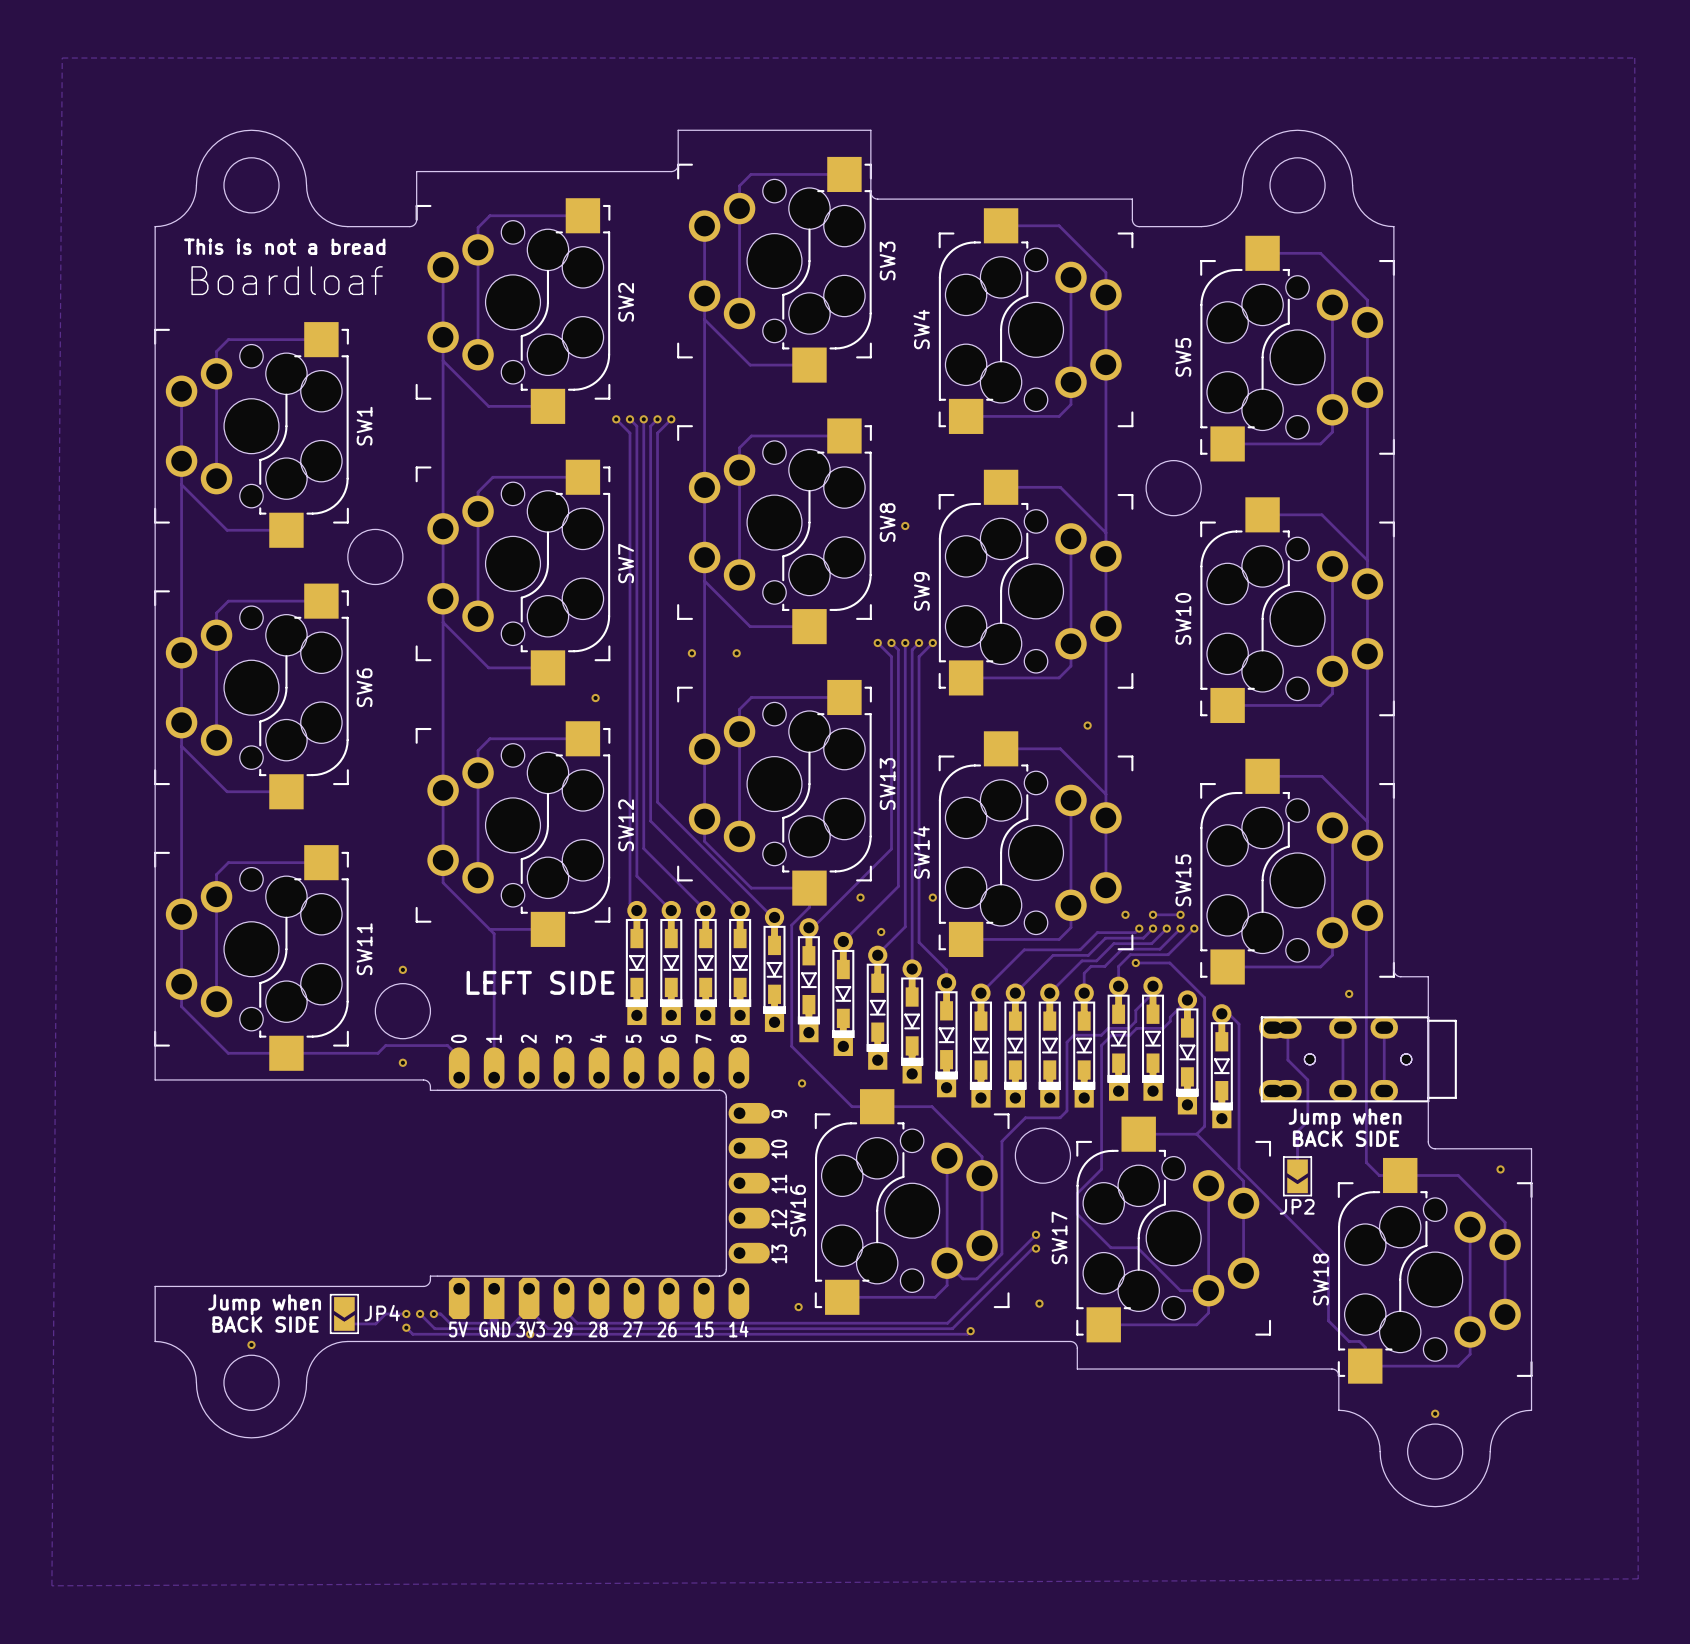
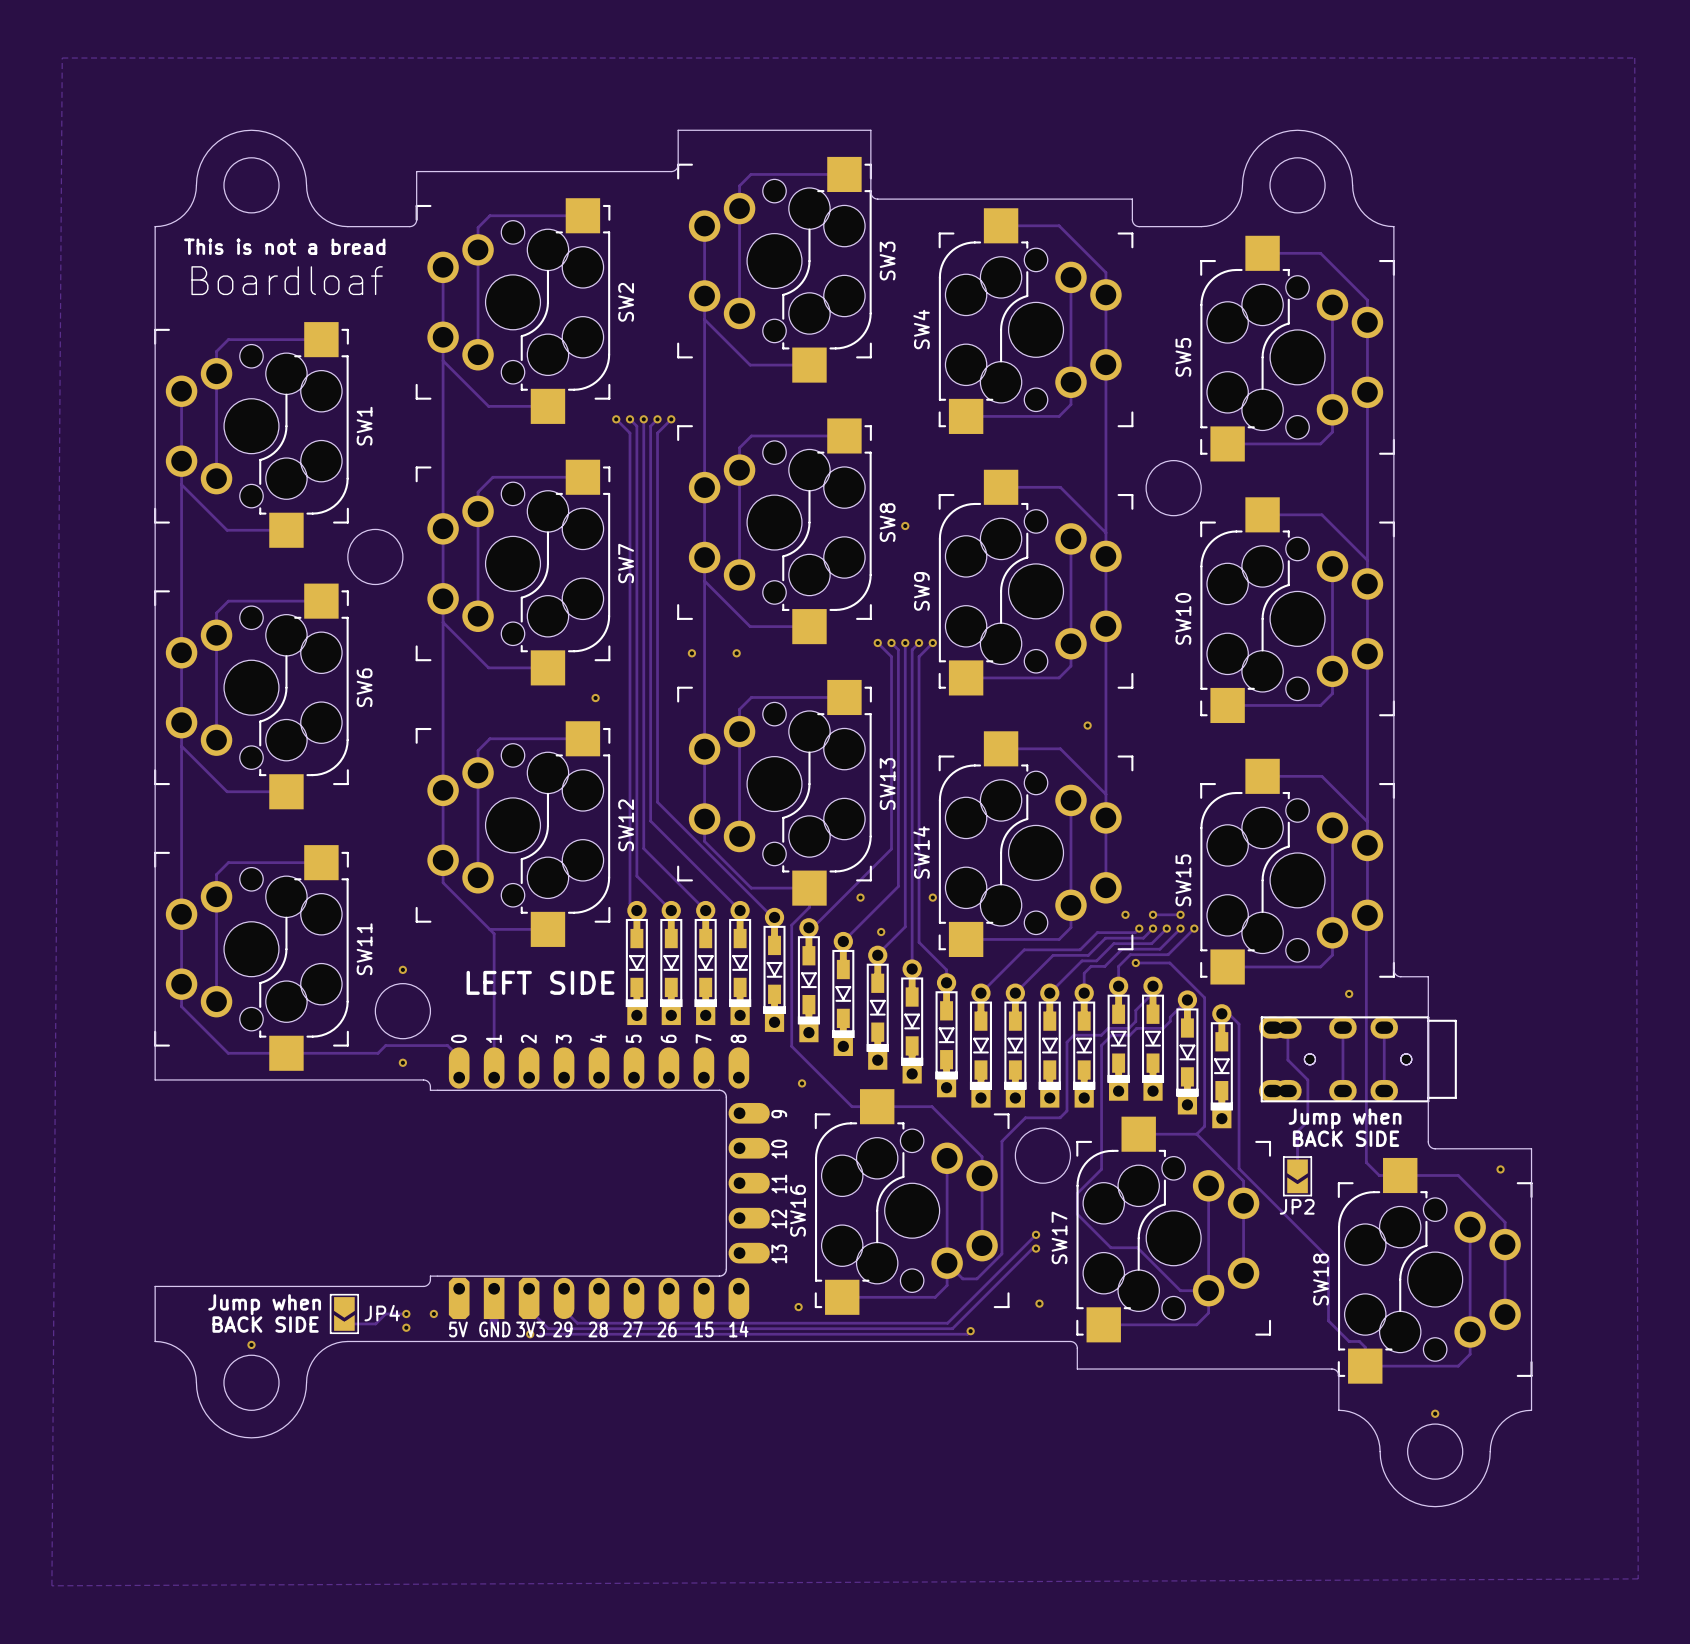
track: (529, 1308) (508, 1328) (434, 1328) (420, 1313) -> none
via: (420, 1313) -> none
track: (433, 1313) (440, 1313) (449, 1323) (494, 1323) -> none
track: (406, 1327) (412, 1334) (540, 1334) -> none

